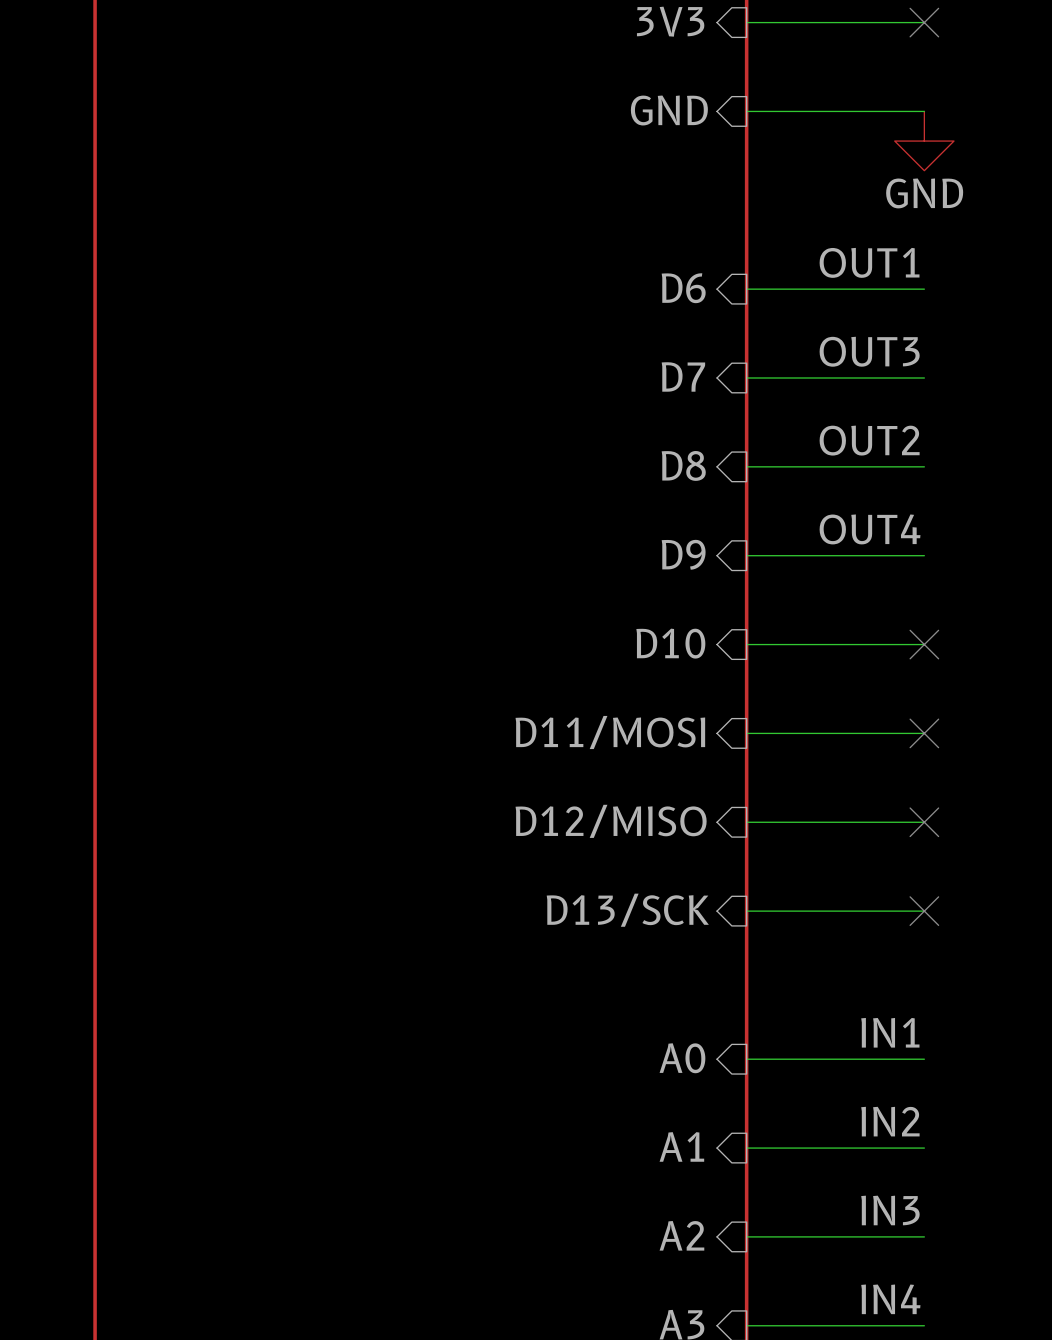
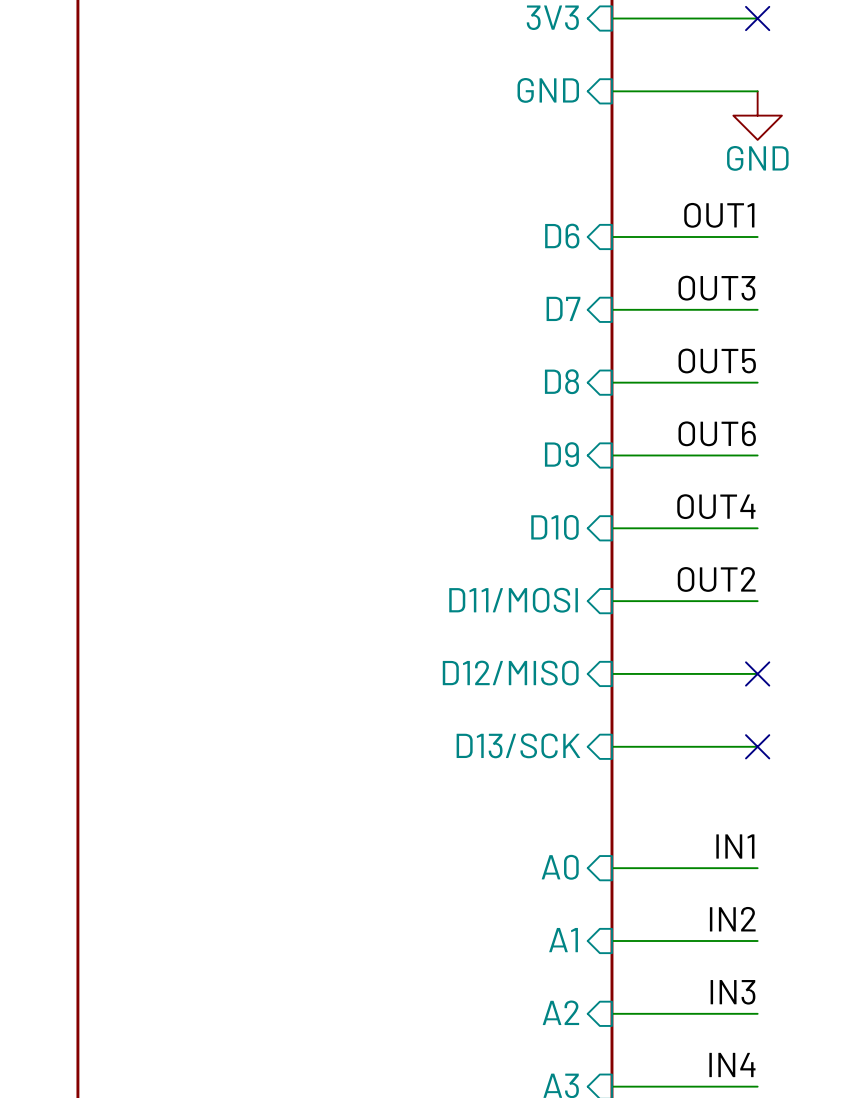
label: OUT2 (869, 440) -> OUT5 (717, 360)
label: OUT4 (870, 529) -> OUT6 (717, 433)
label: none -> OUT4 (716, 506)
no-connect mark: (924, 644) -> none
label: none -> OUT2 (716, 579)
no-connect mark: (924, 733) -> none

